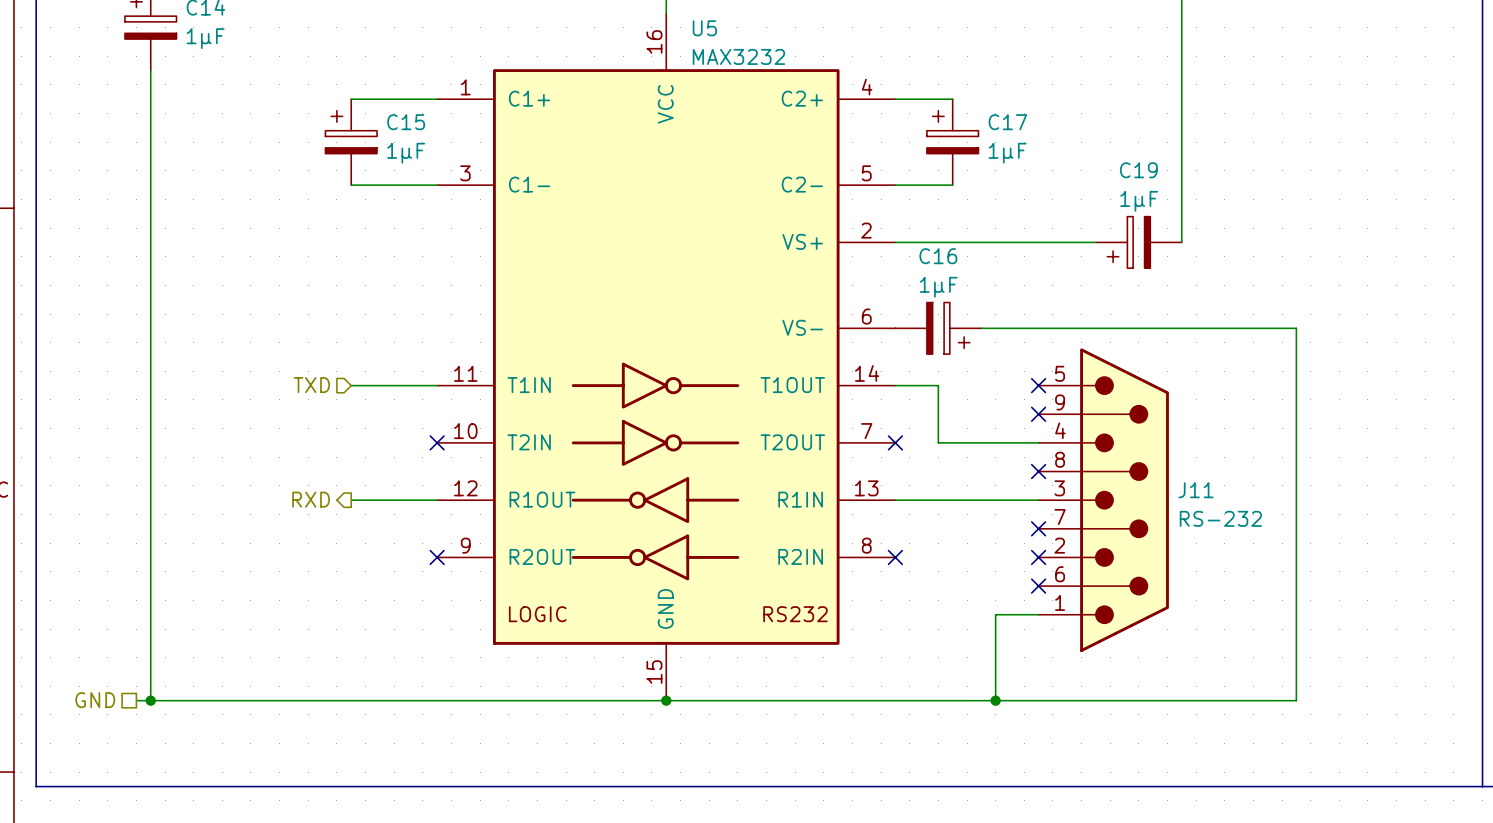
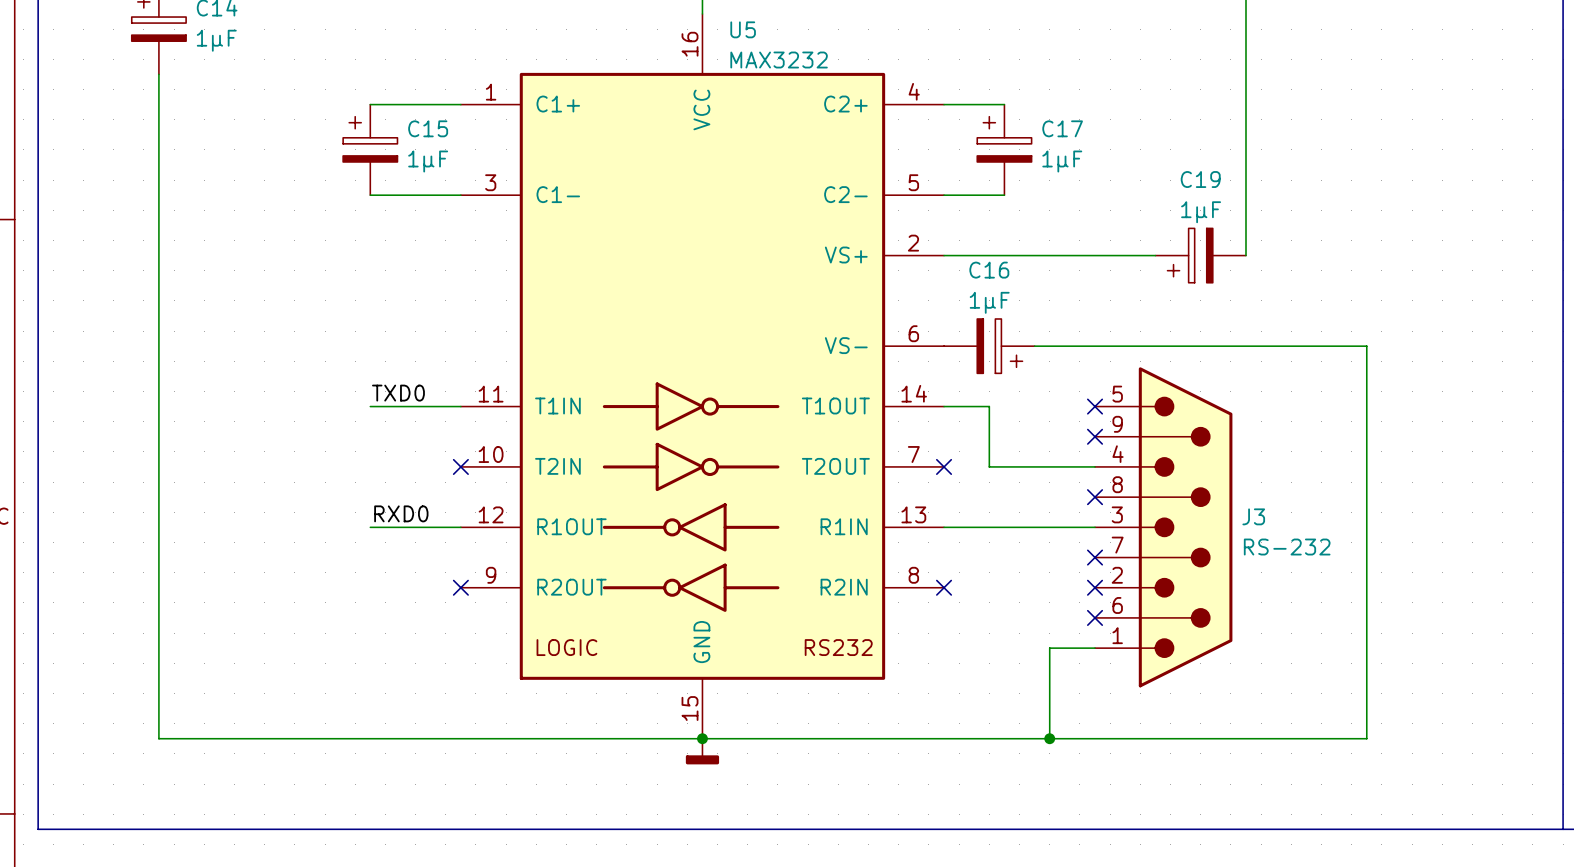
label: none -> TXD0 (398, 393)
hierarchical label: TXD (311, 385) -> none
label: none -> RXD0 (401, 513)
J11 name: J11 (1195, 490) -> J3 (1253, 516)
hierarchical label: RXD (311, 499) -> none
hierarchical label: GND (95, 700) -> none
wire: (136, 700) (150, 700) -> none
junction: (150, 700) -> none
power symbol: none -> (702, 751)

